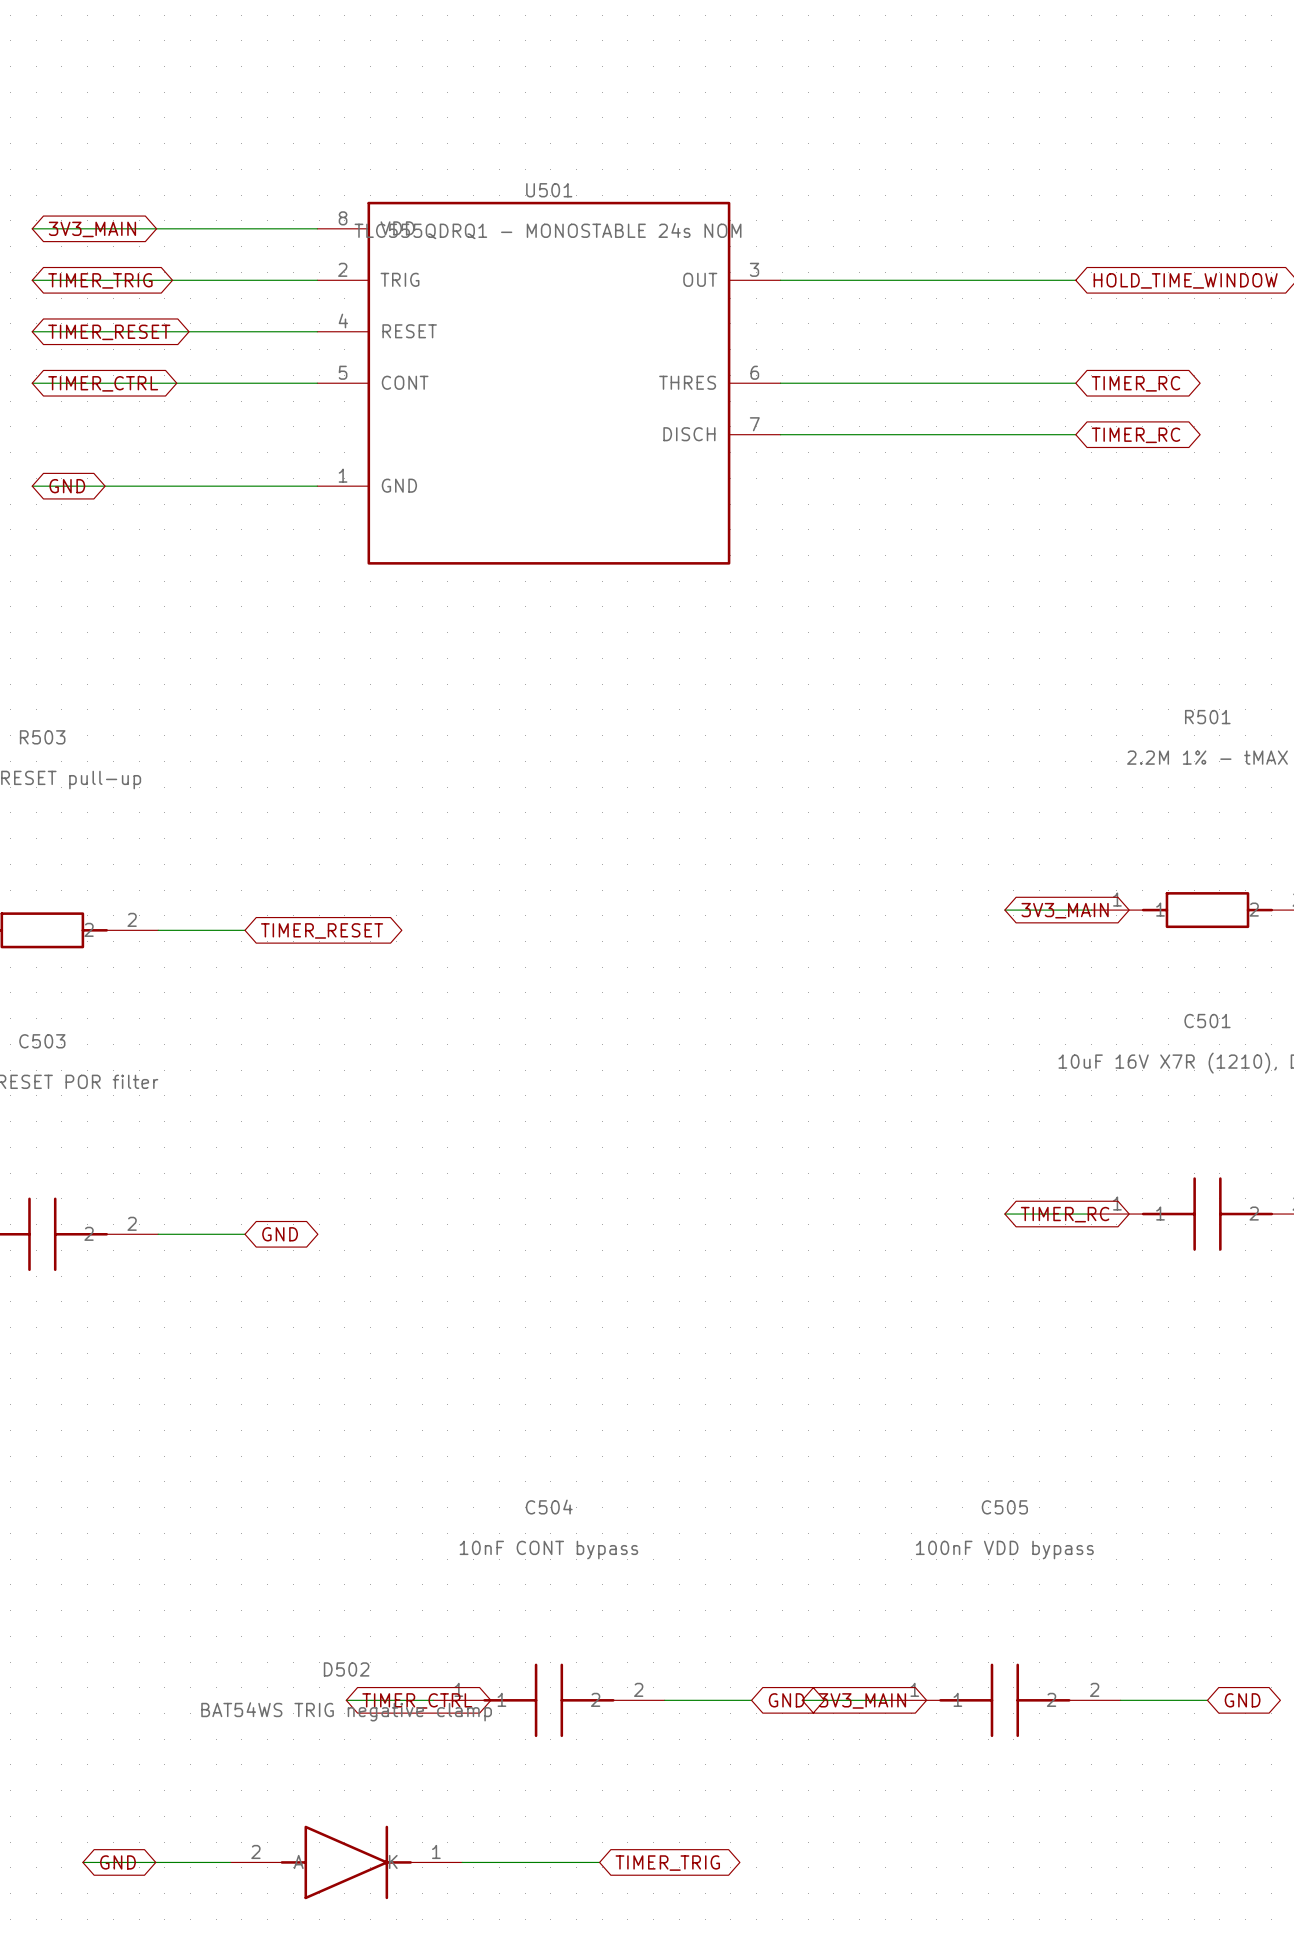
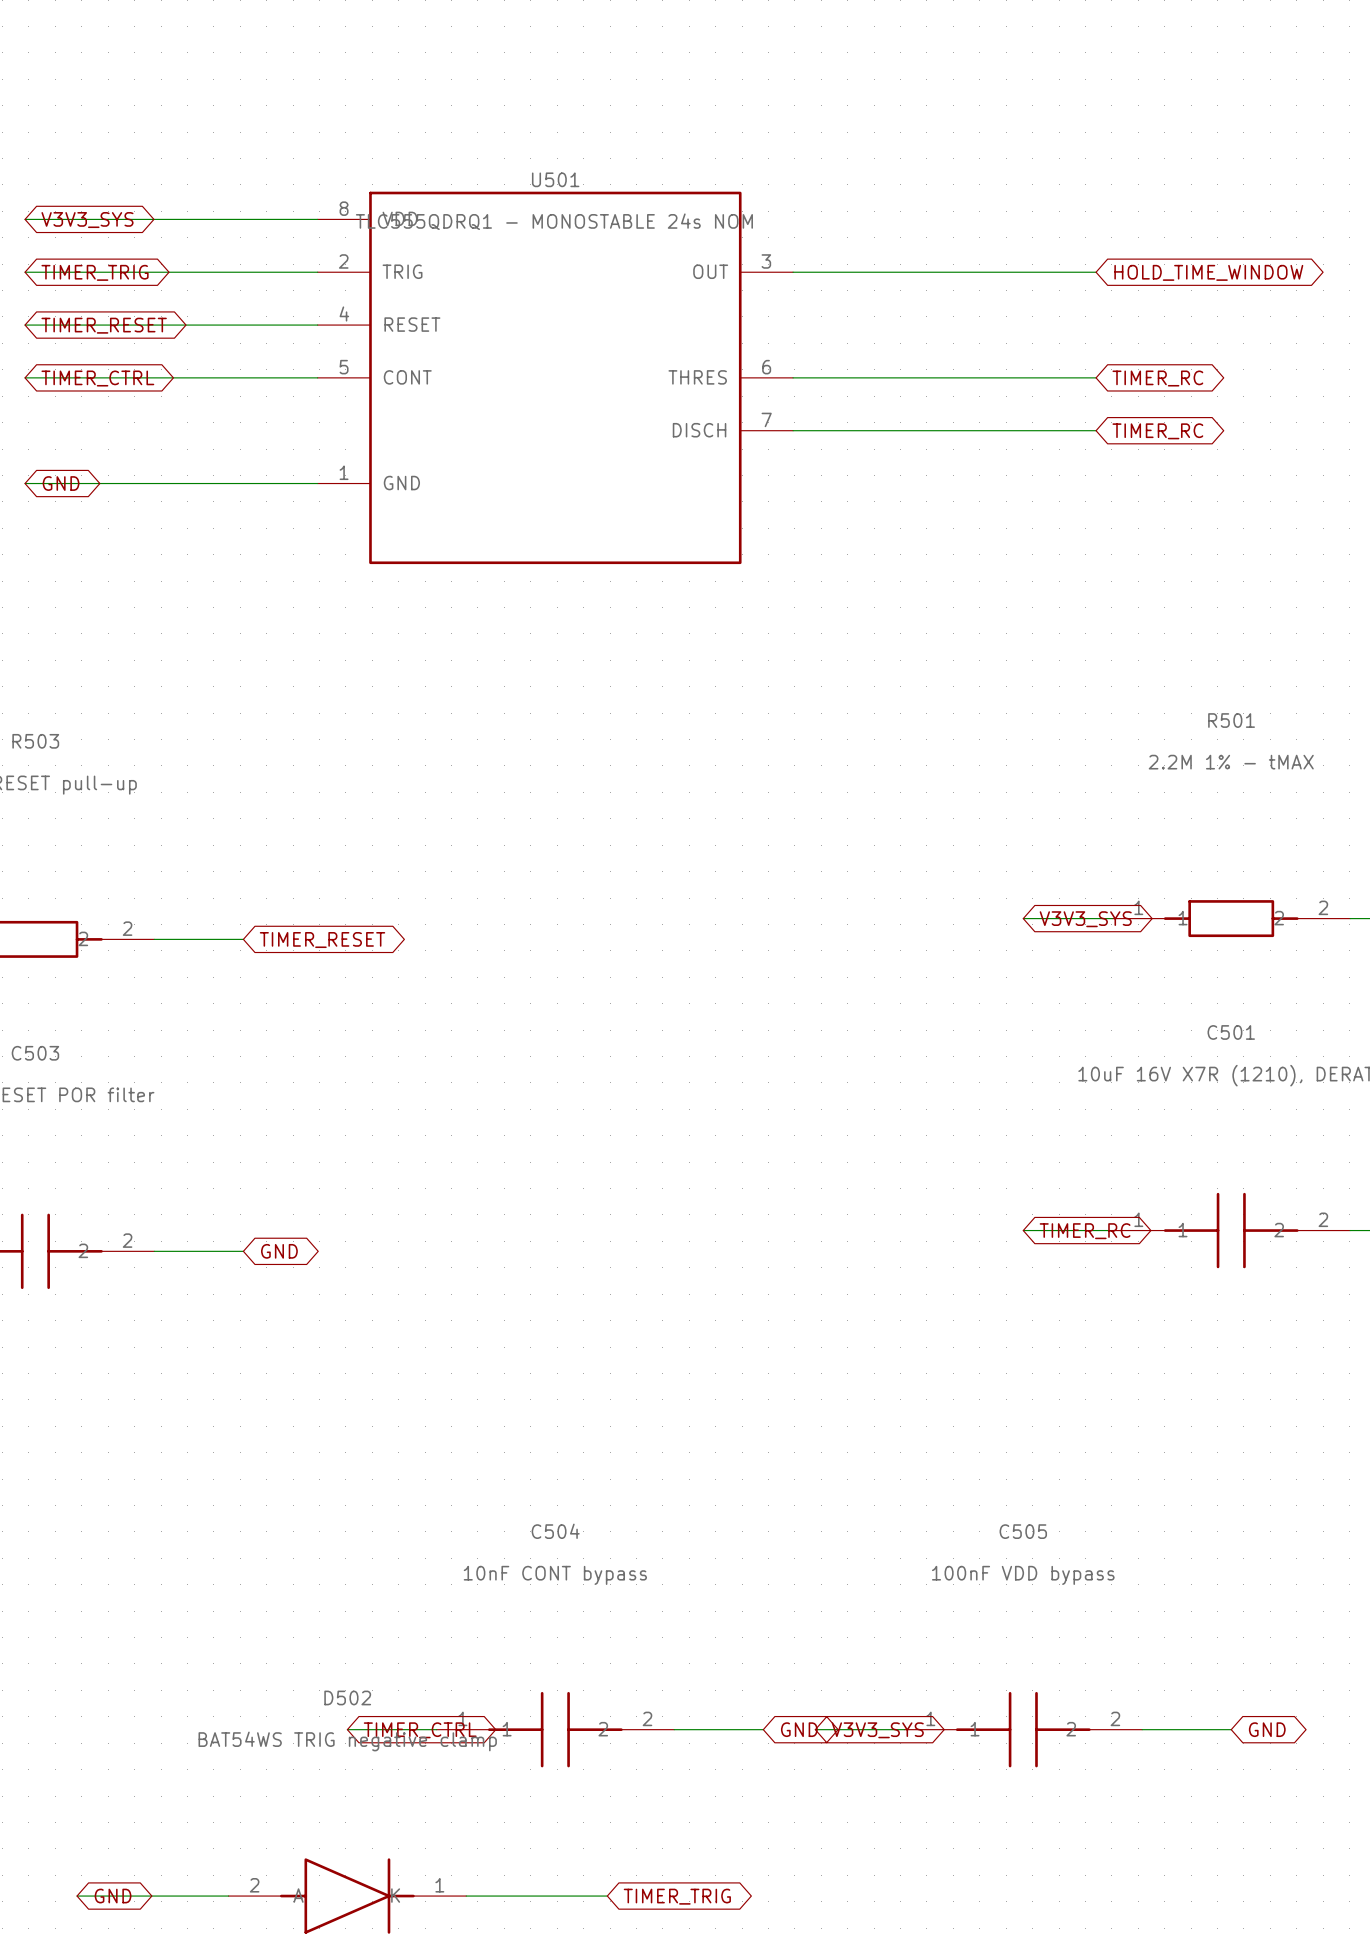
global label: 3V3_MAIN (92, 229) -> V3V3_SYS (87, 220)
global label: 3V3_MAIN (1065, 910) -> V3V3_SYS (1085, 919)
global label: 3V3_MAIN (862, 1700) -> V3V3_SYS (877, 1730)

